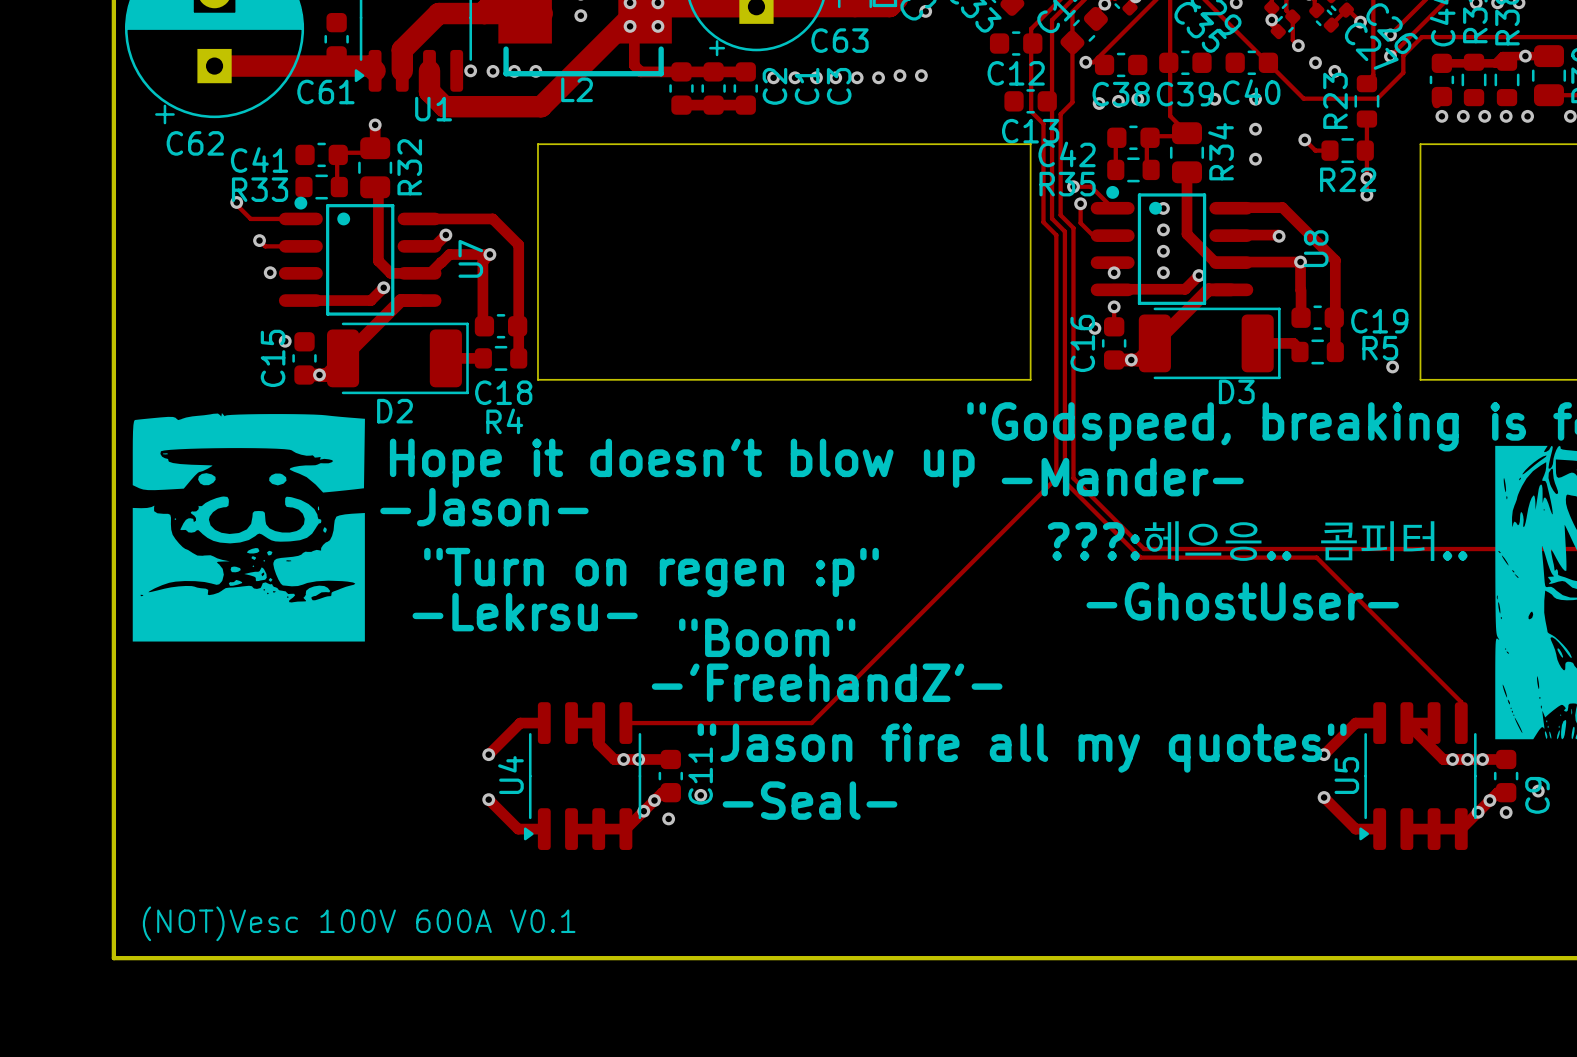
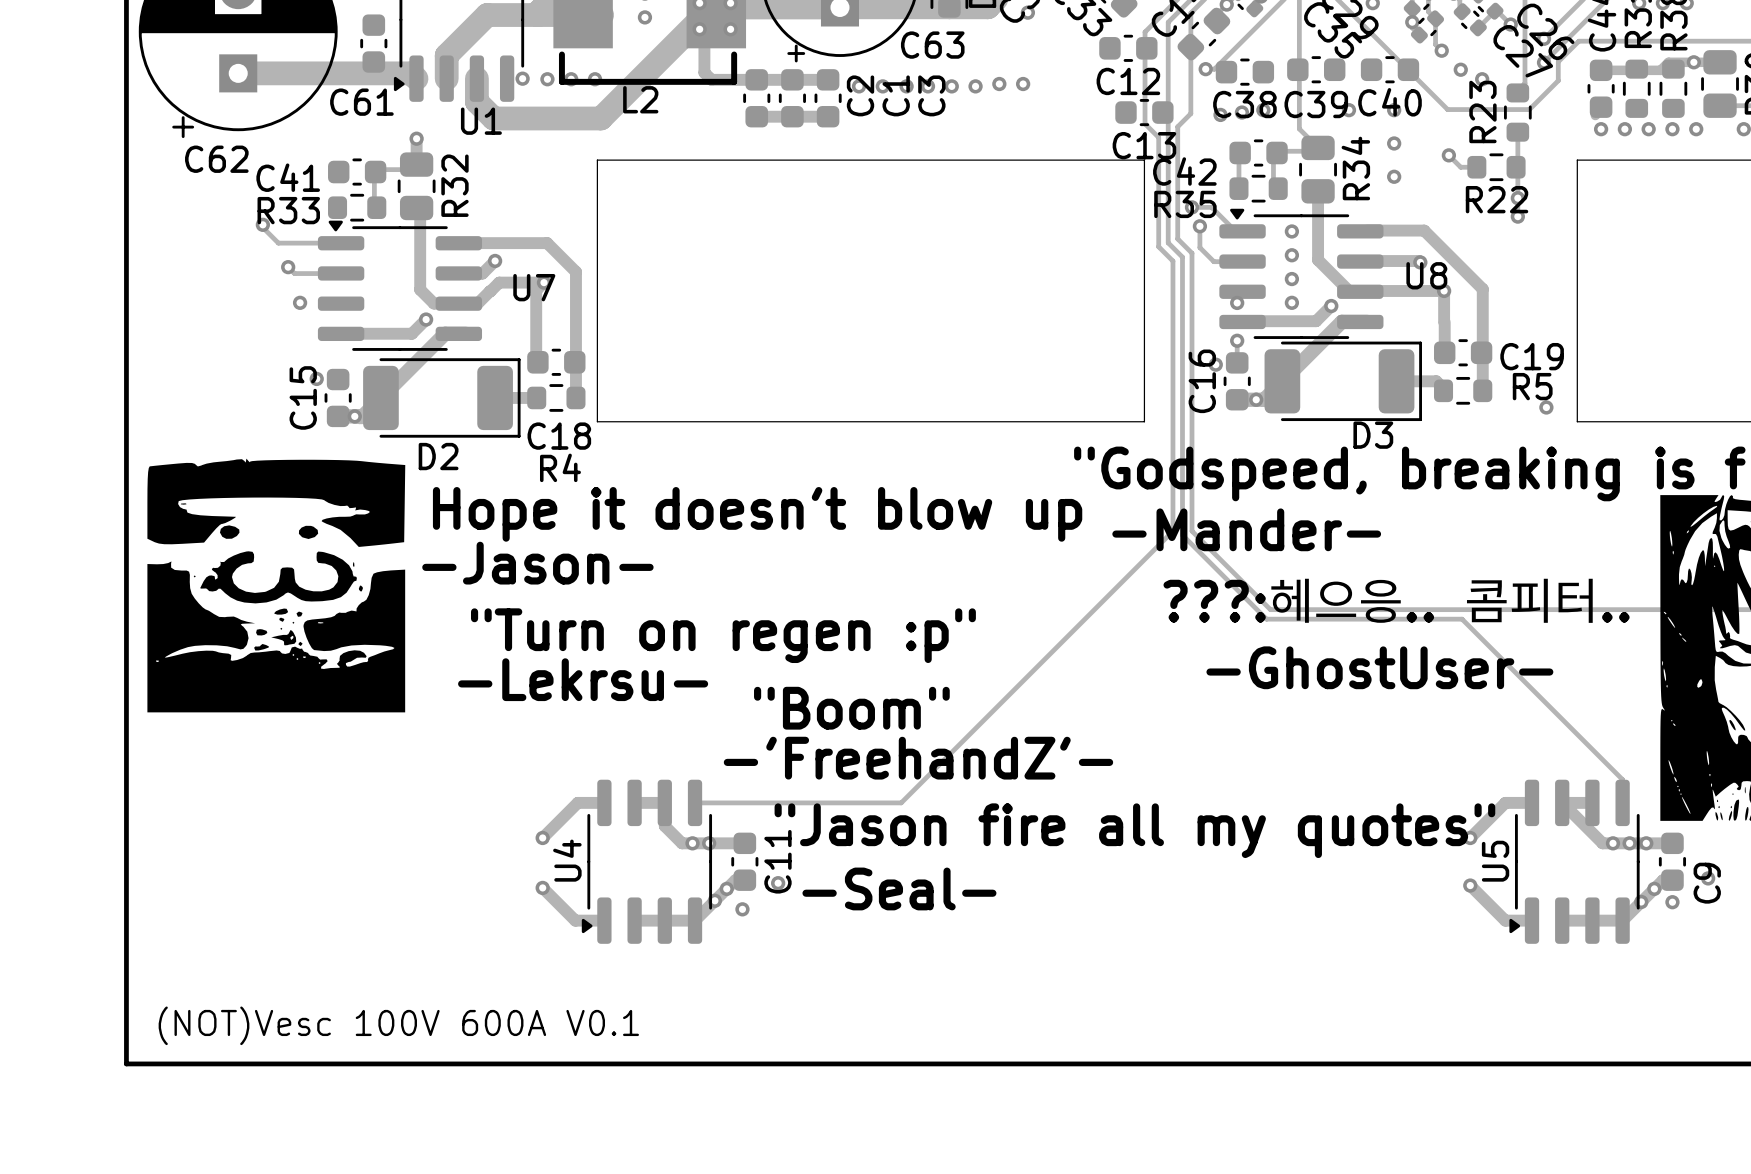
U8 footprint: [1090, 185, 1254, 305] -> [1219, 208, 1384, 339]
U7 footprint: [278, 196, 442, 316] -> [317, 220, 483, 351]

